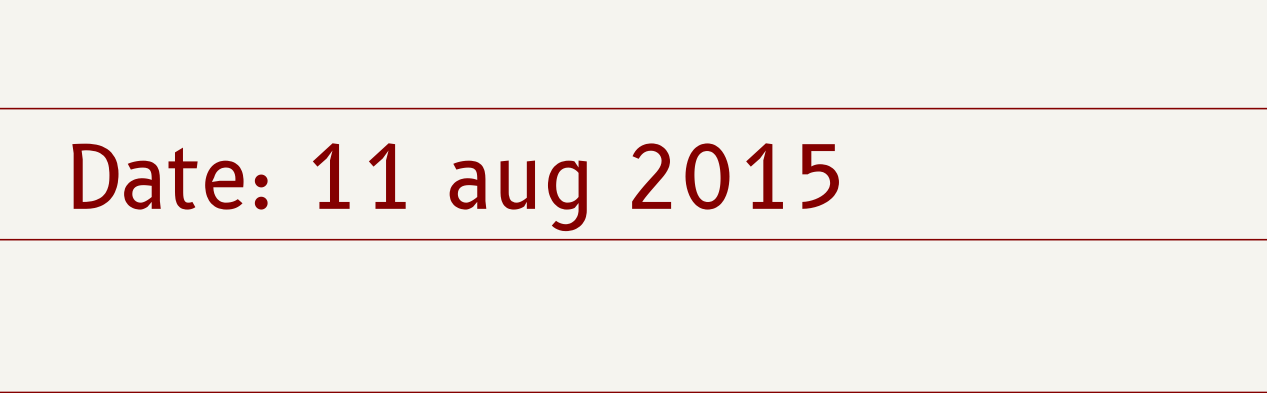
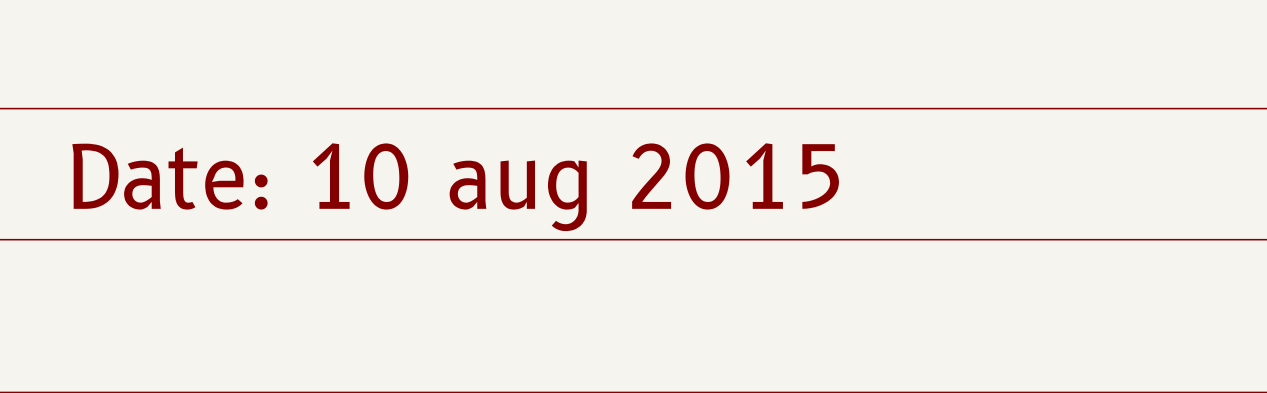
title block: Date: 11 aug 2015 (455, 187) -> Date: 10 aug 2015 (455, 187)

